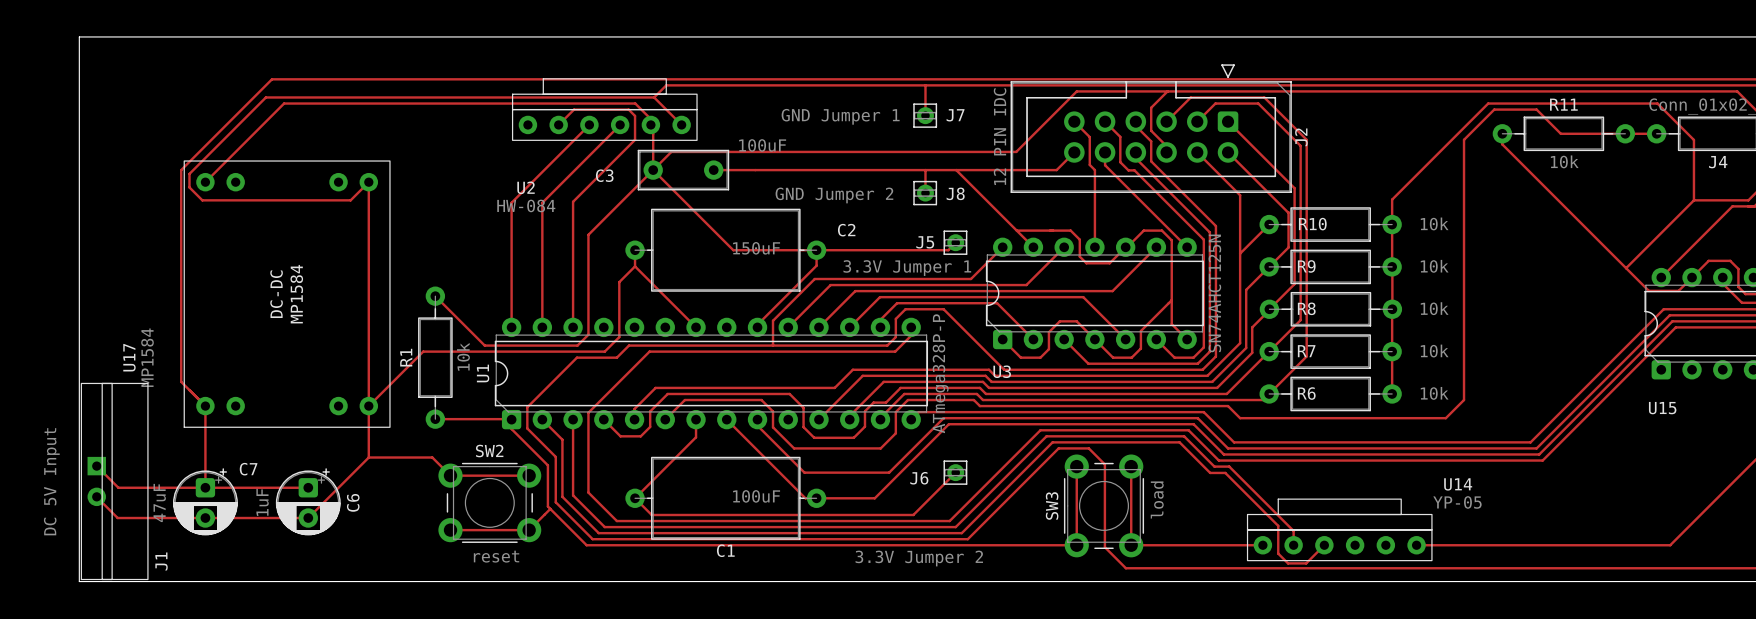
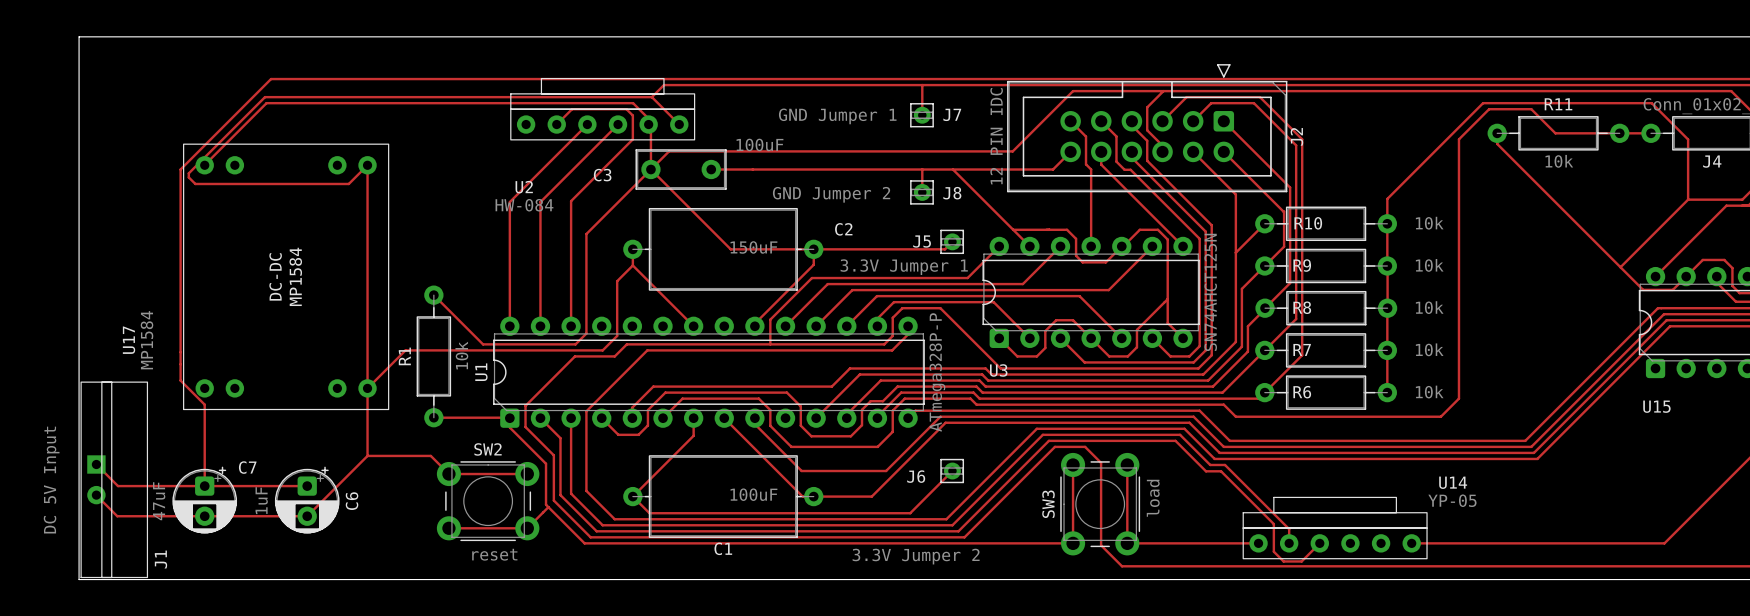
top track: (284, 103) (205, 182) -> (283, 103) (266, 103) (204, 164)
top track: (189, 178) (189, 187) (202, 200) (350, 200) (368, 182) -> (188, 177) (195, 183) (348, 183) (367, 165) (367, 181)
U17 position: (287, 294) -> (286, 276)
top track: (423, 351) (368, 406) -> (421, 350) (405, 350) (367, 388)

